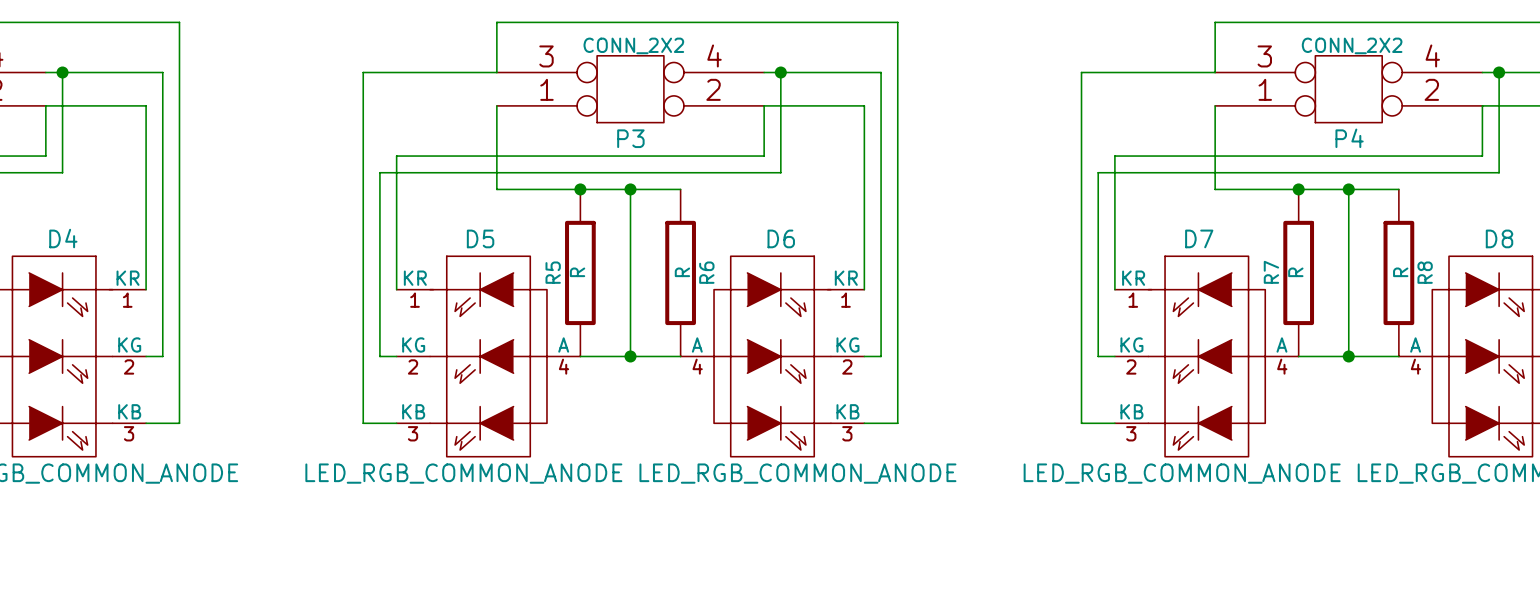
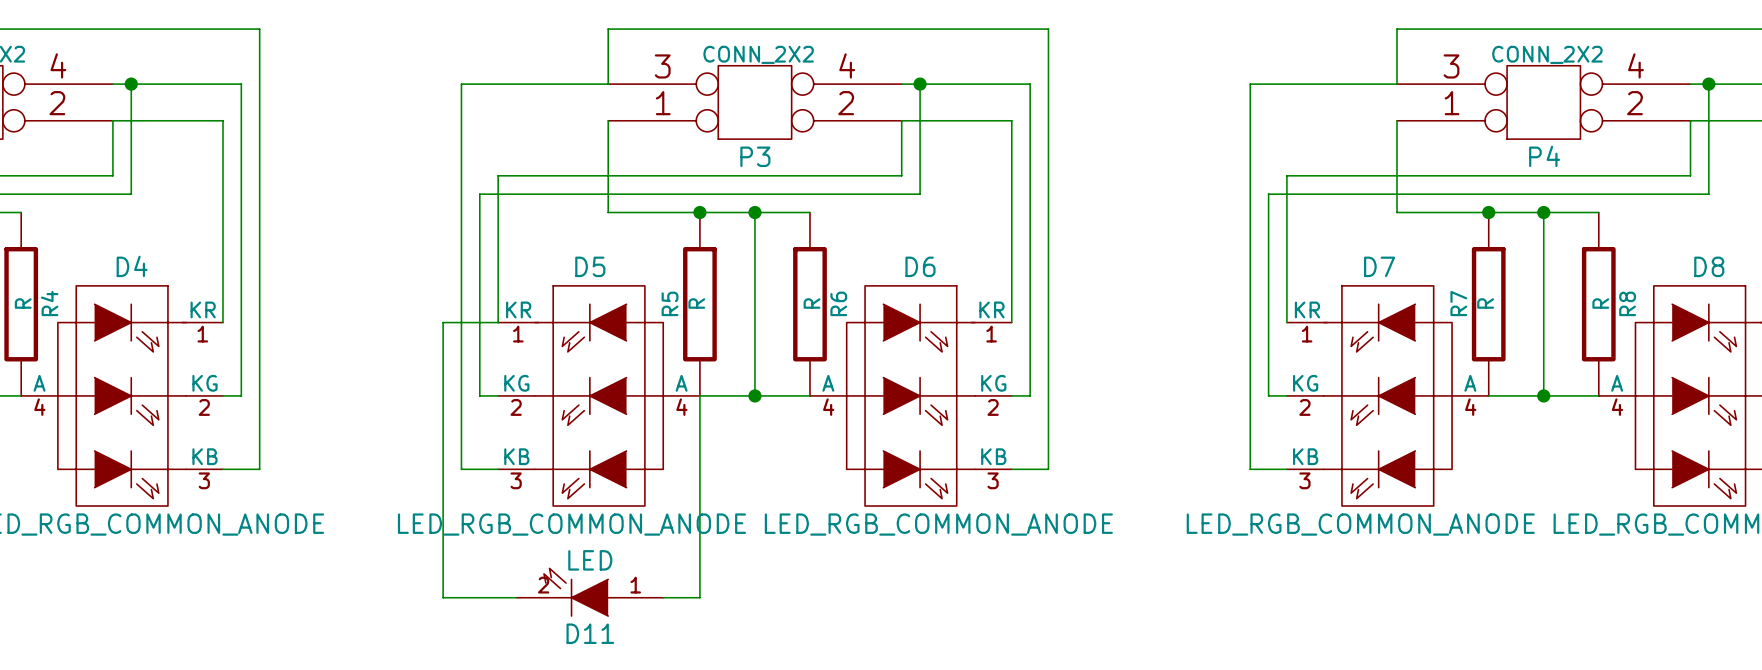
wire: none -> (498, 322) (443, 322) (443, 597) (516, 597)
wire: none -> (699, 395) (699, 597) (663, 597)
D11: none -> LED (589, 592)

